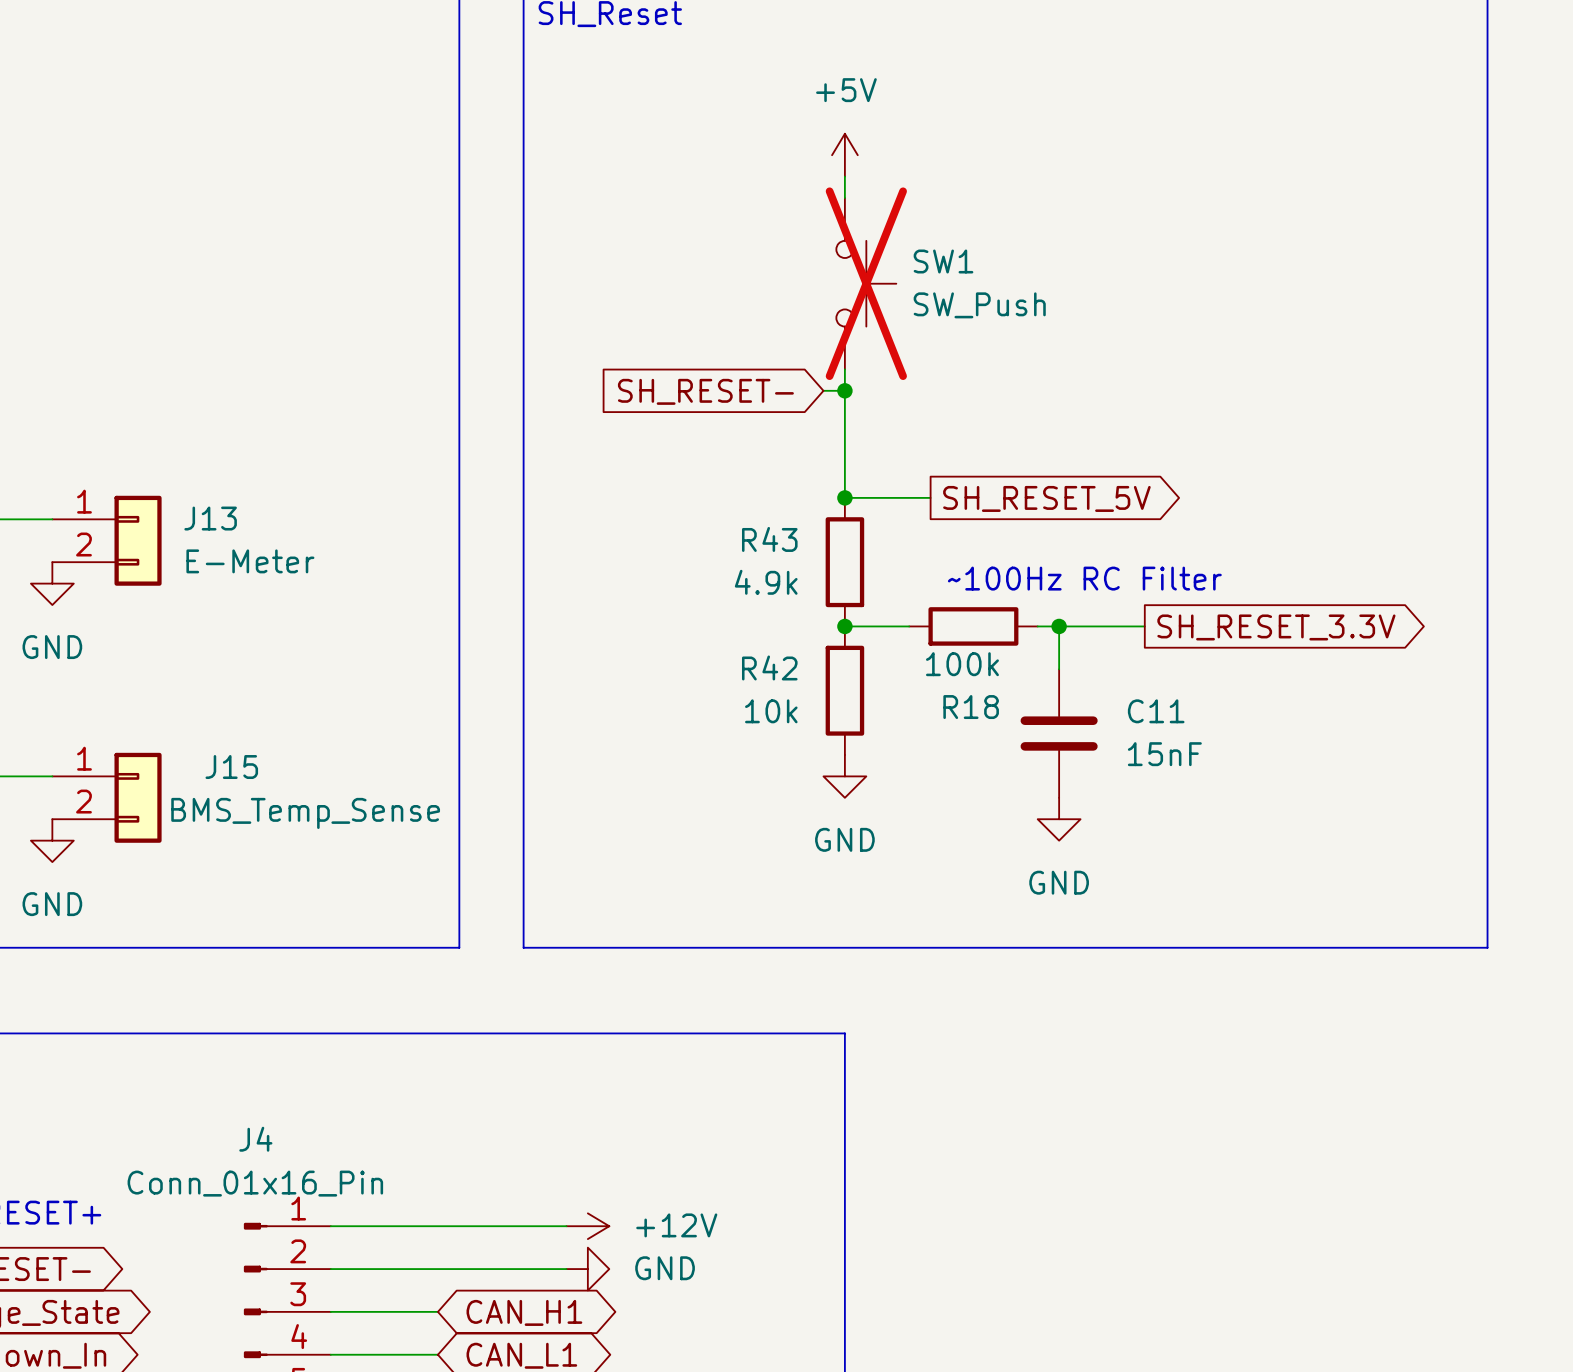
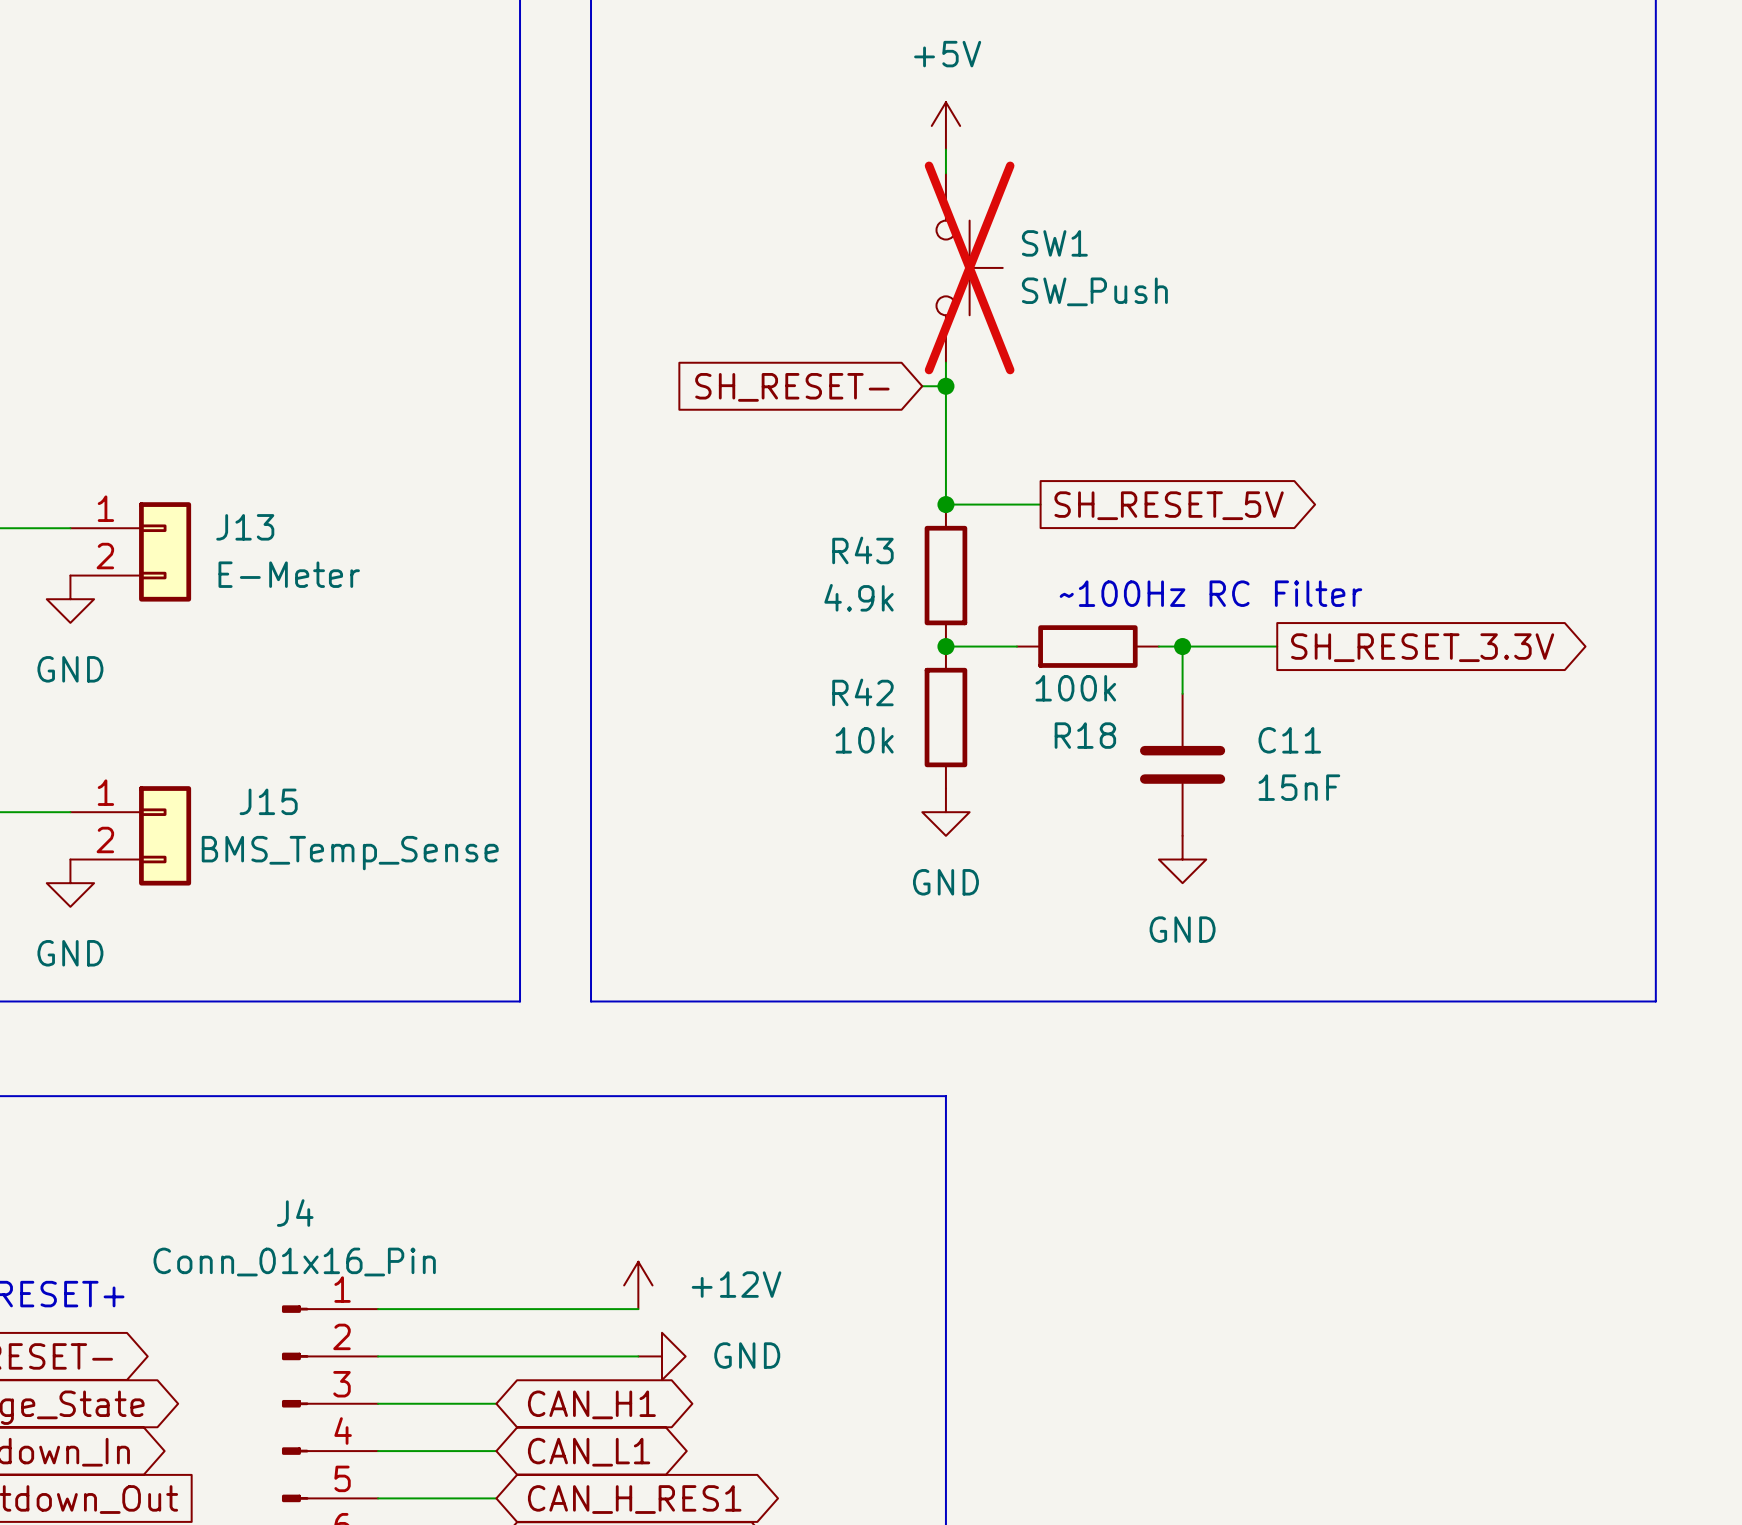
power symbol rotation: 0° (587, 1226) -> 90° counterclockwise (638, 1285)
power symbol position: +12V (587, 1226) -> +12V (638, 1285)

